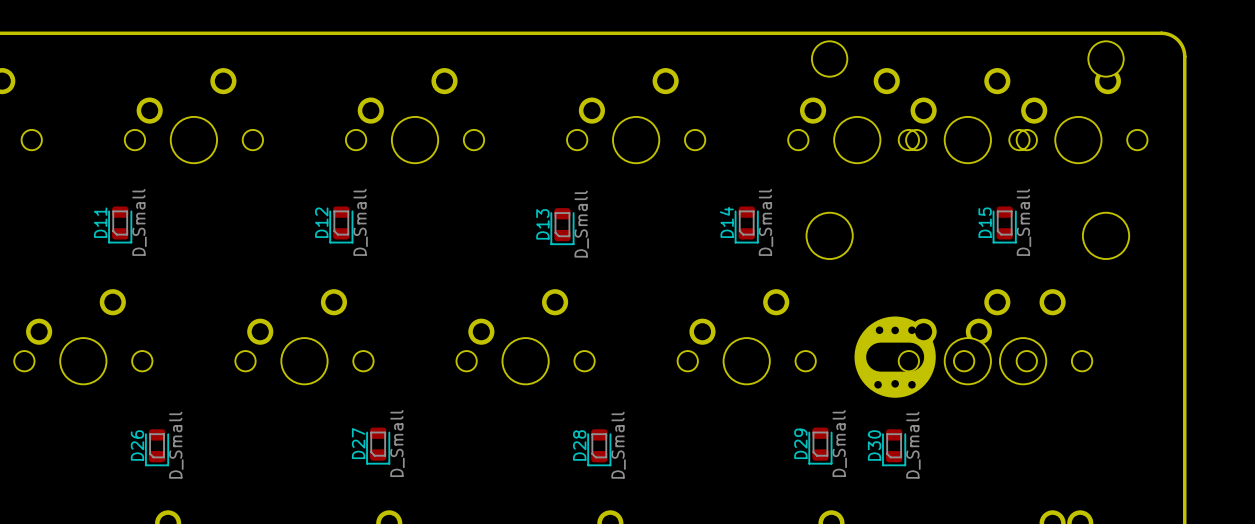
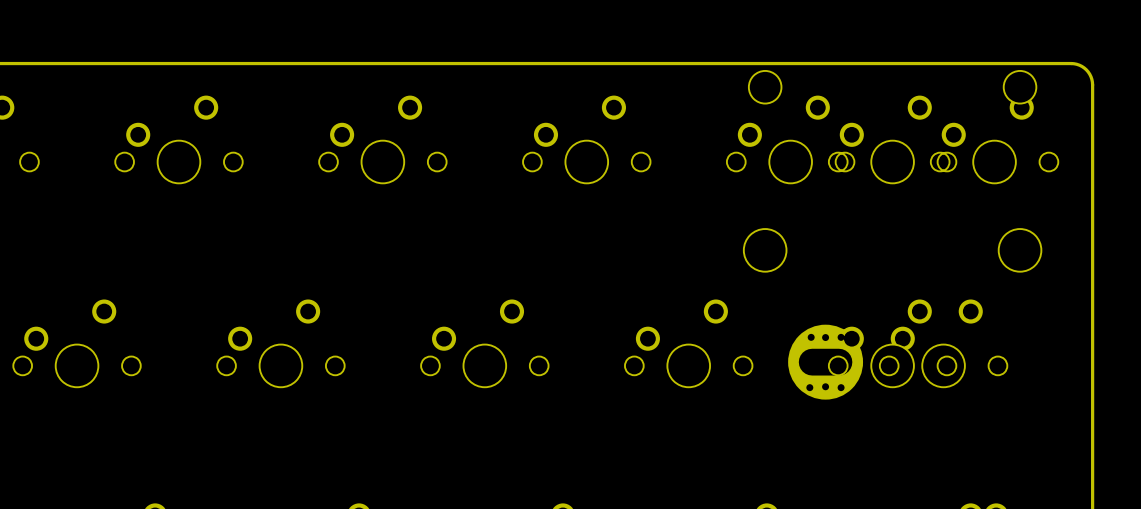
D11: D_Small (120, 224) -> none
D12: D_Small (341, 224) -> none
D14: D_Small (746, 224) -> none
D15: D_Small (1004, 224) -> none
D13: D_Small (562, 226) -> none
D27: D_Small (378, 445) -> none
D29: D_Small (820, 445) -> none
D26: D_Small (157, 447) -> none
D28: D_Small (599, 447) -> none
D30: D_Small (894, 447) -> none

